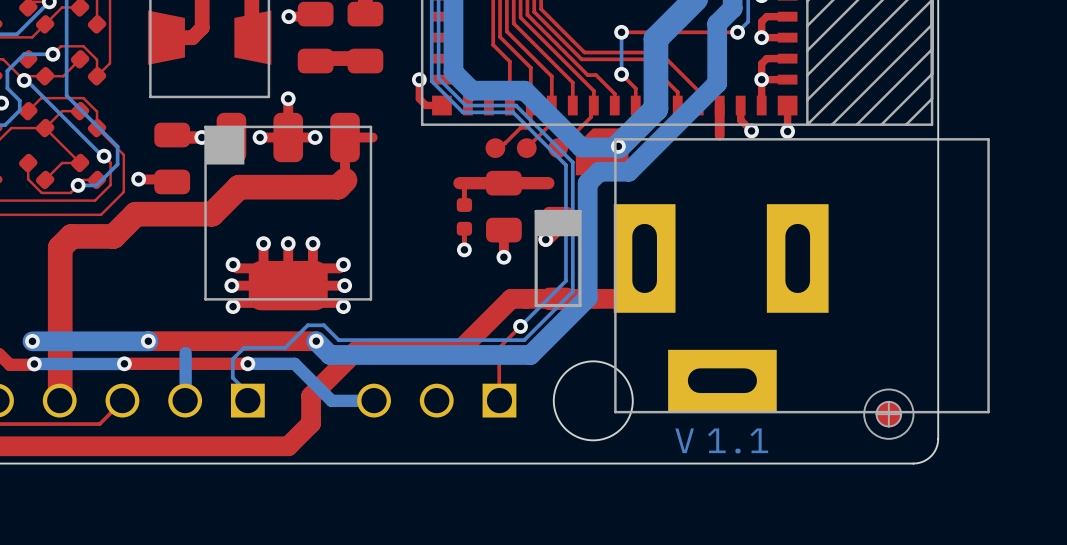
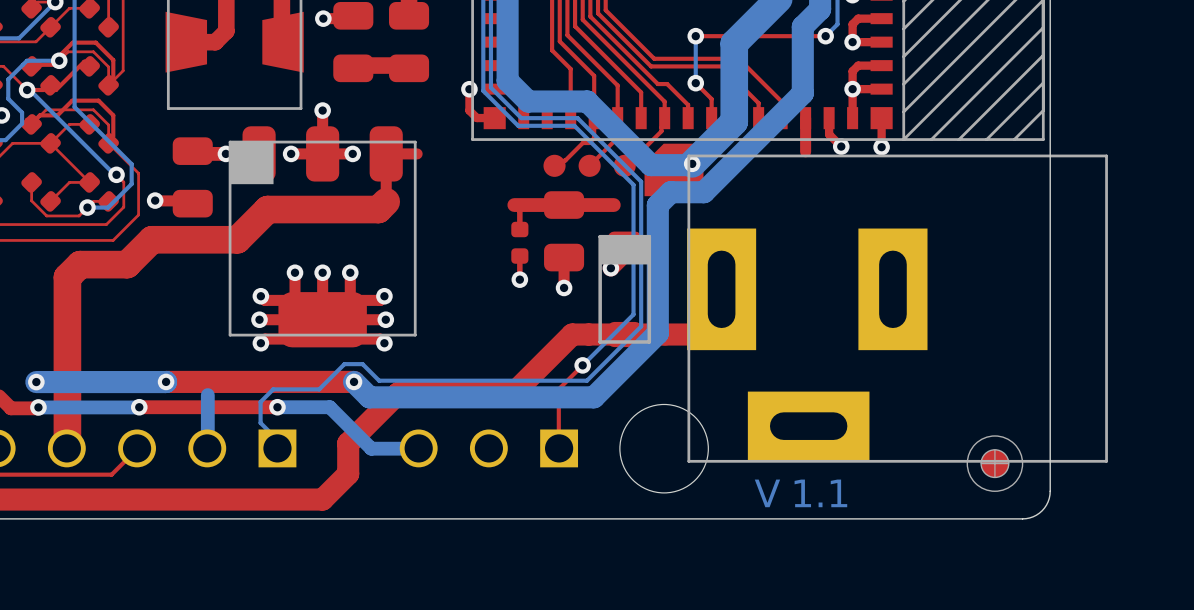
top track: none -> (26, 61) (37, 61) (40, 64) (55, 64) (58, 56) (72, 42) (95, 42) (113, 60) (113, 78)
top track: none -> (84, 61) (55, 90)
top track: (80, 59) (63, 76) (28, 76) (24, 80) -> (43, 90) (27, 90)
top track: none -> (26, 119) (35, 119) (39, 115) (57, 115) (72, 100) (98, 100) (113, 115) (113, 136)

